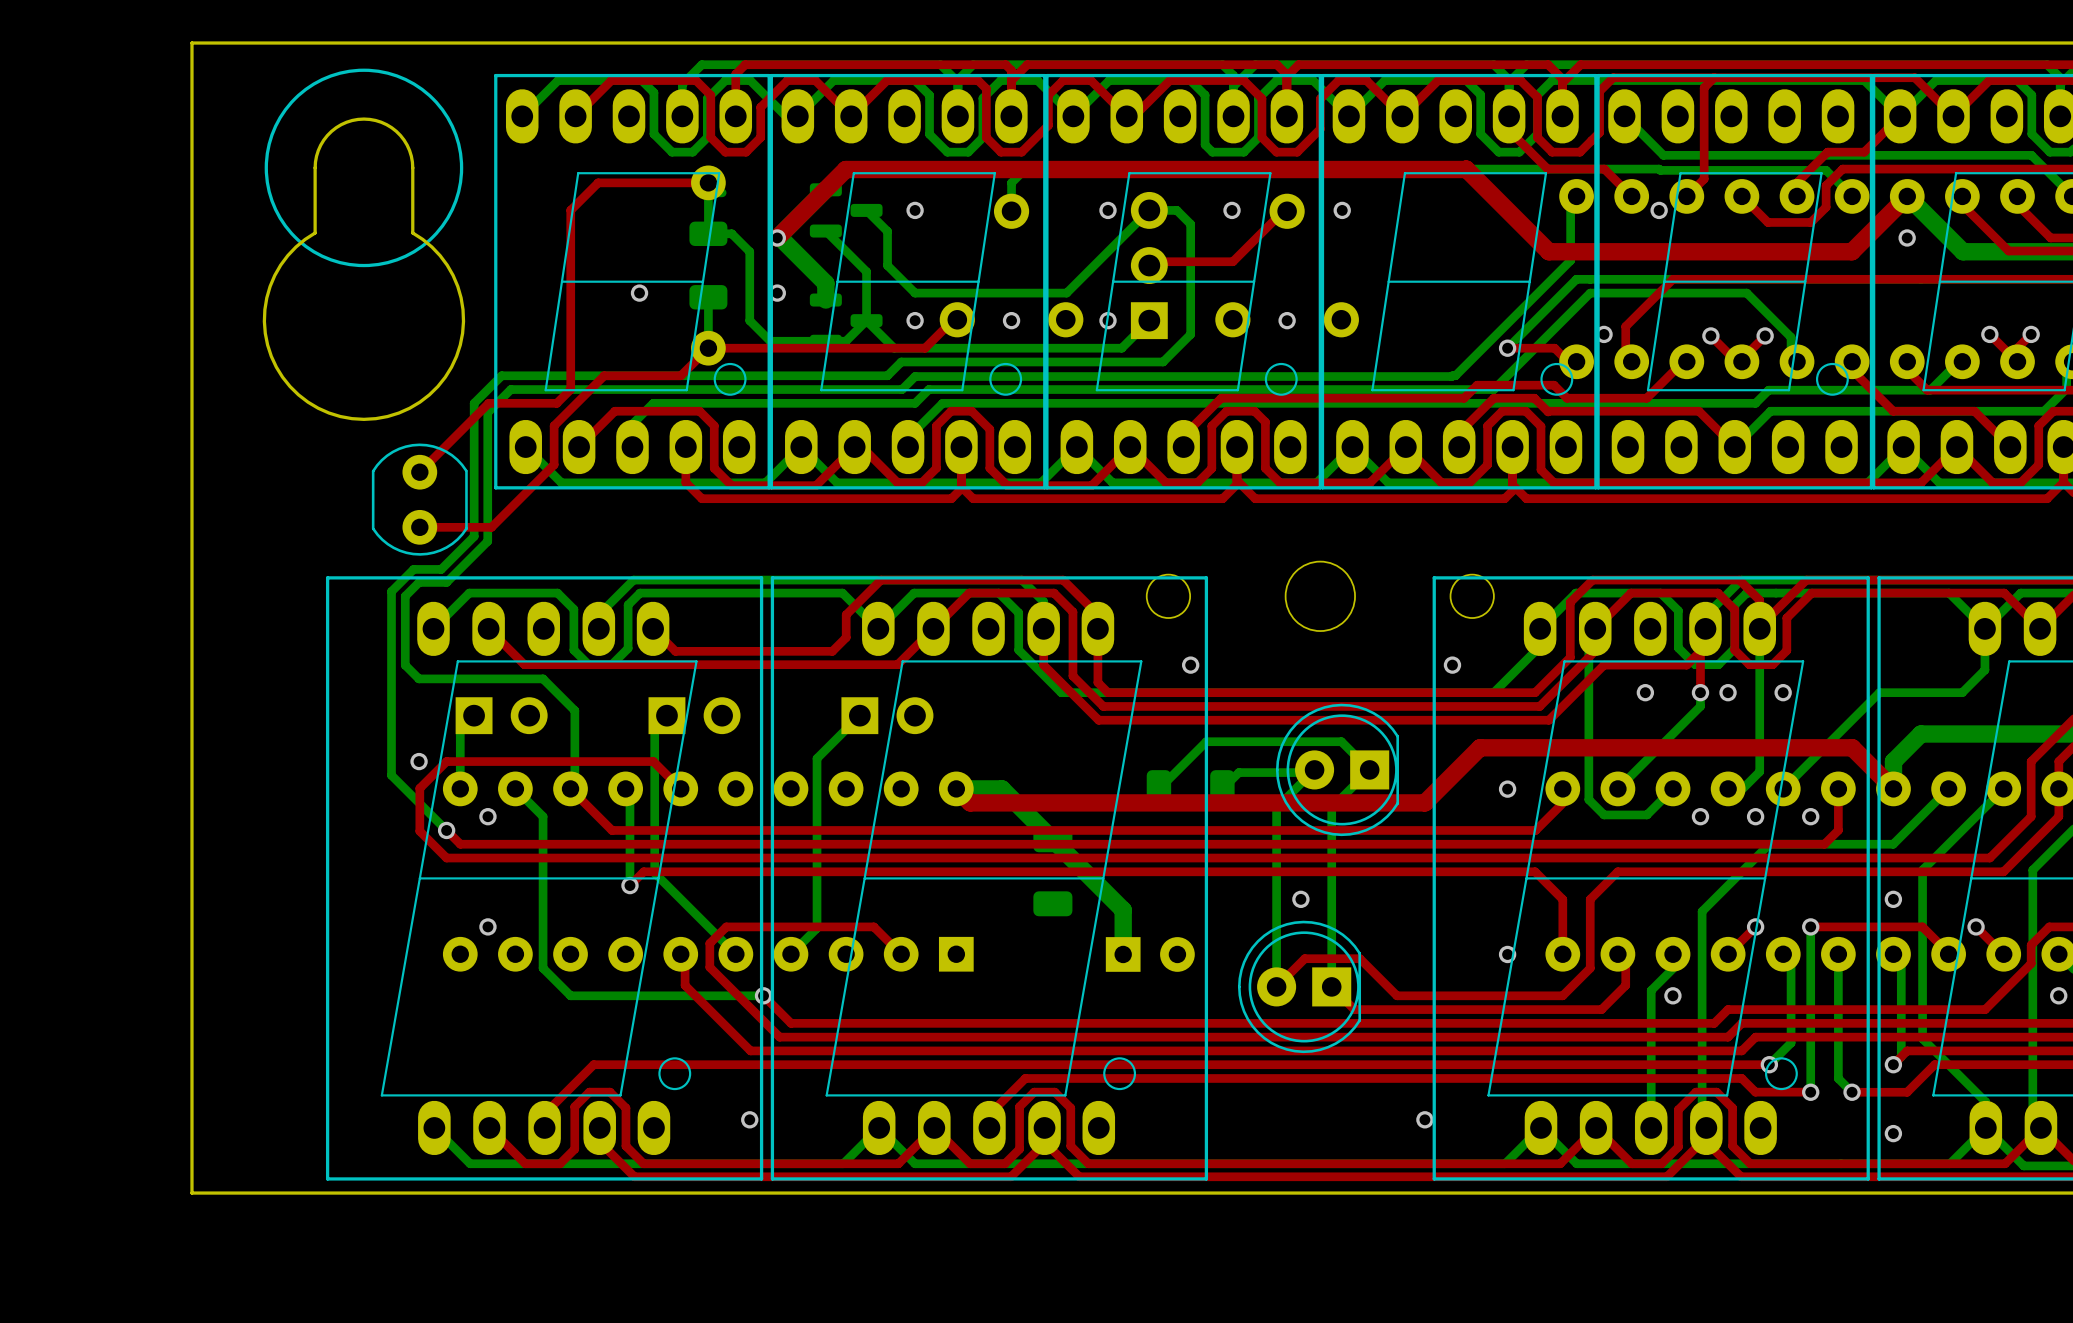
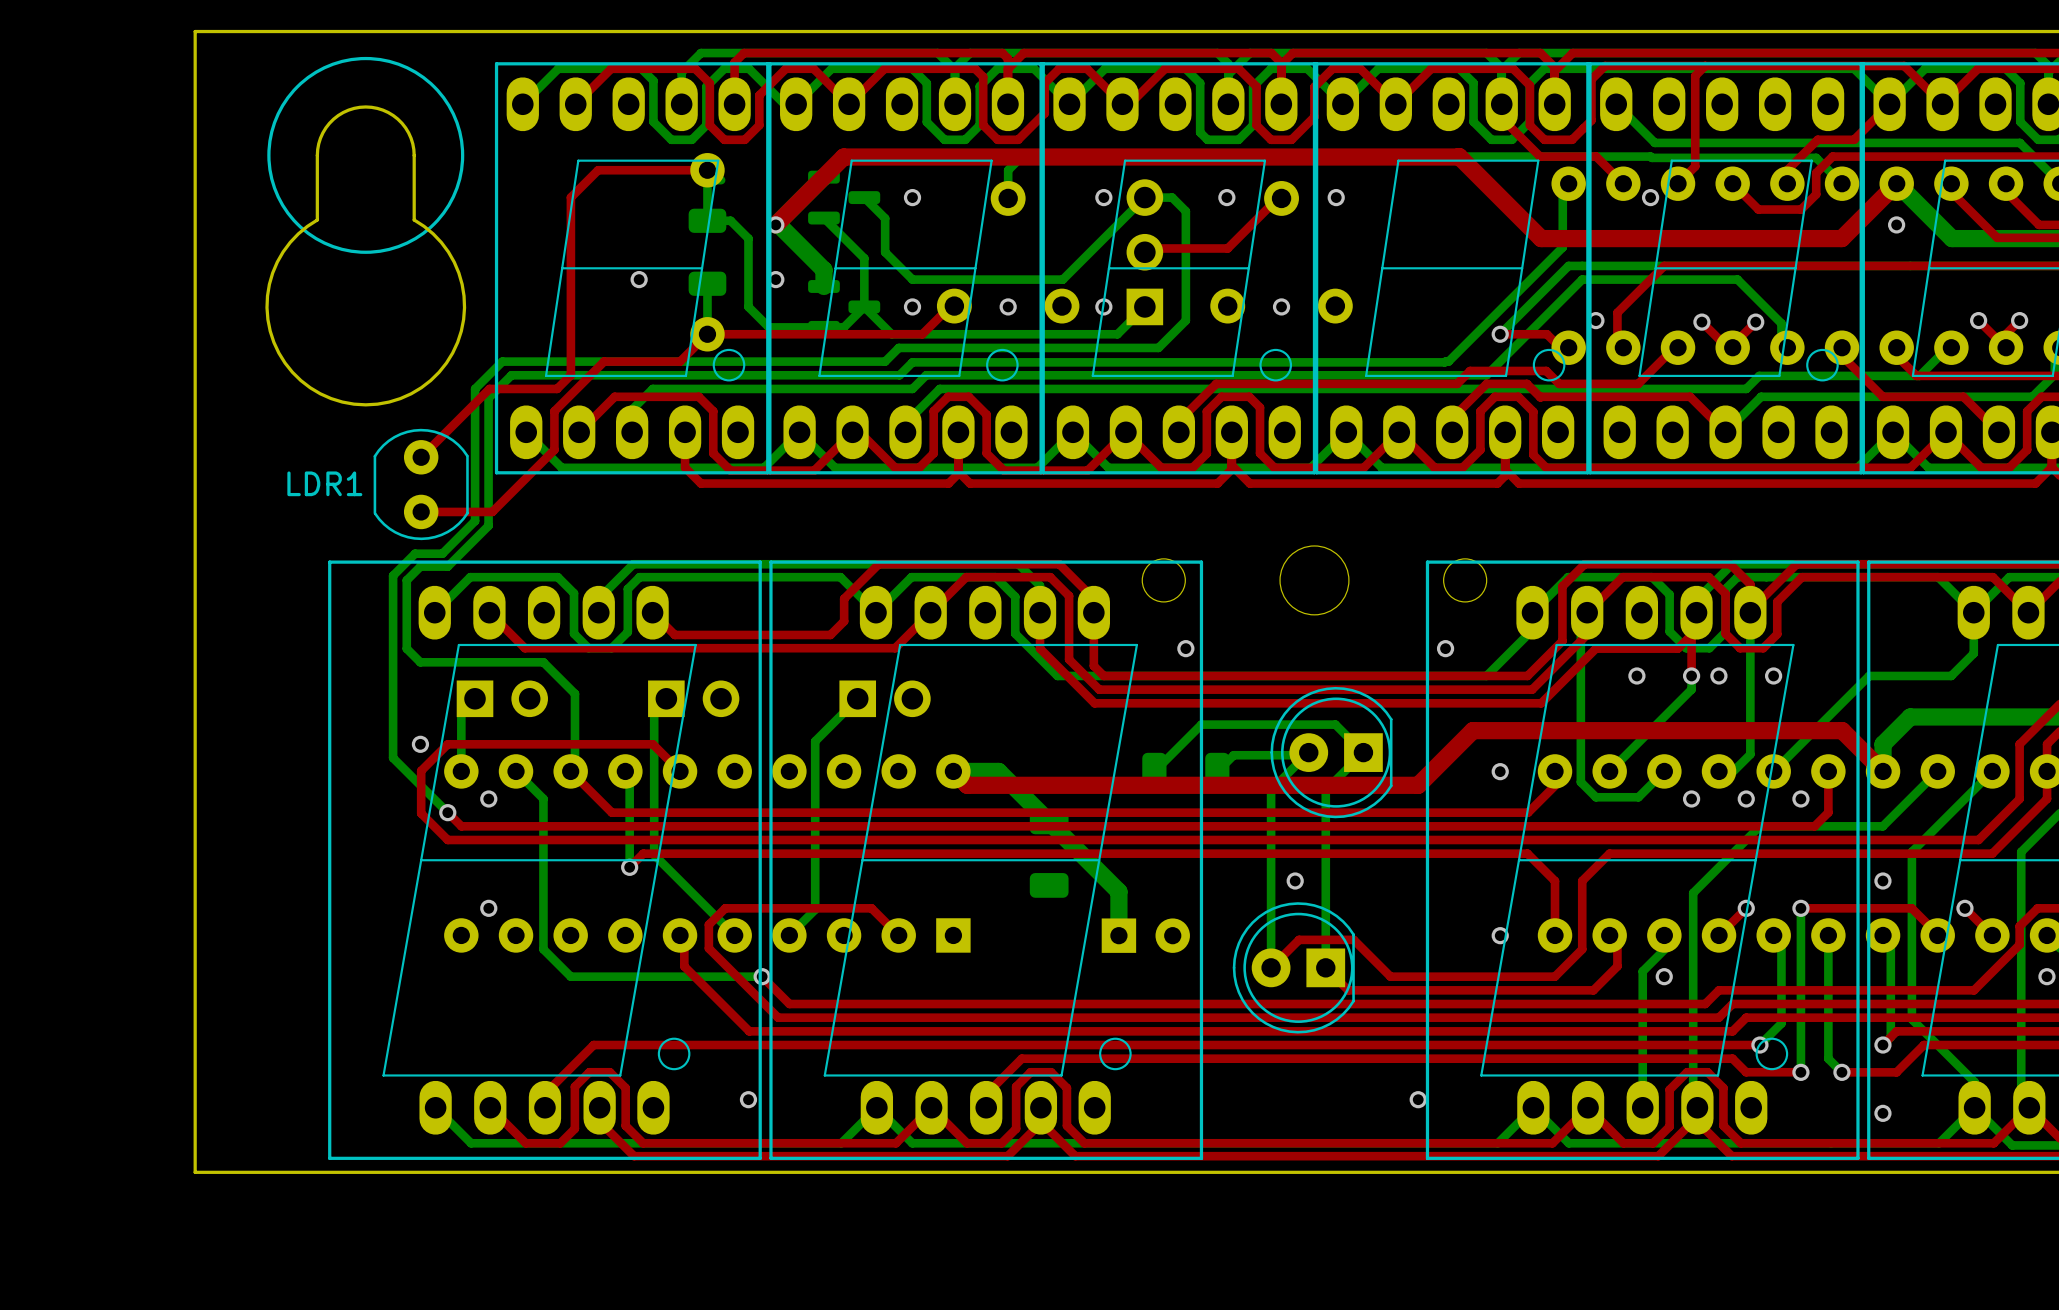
LDR1 name: none -> LDR1 (324, 483)

